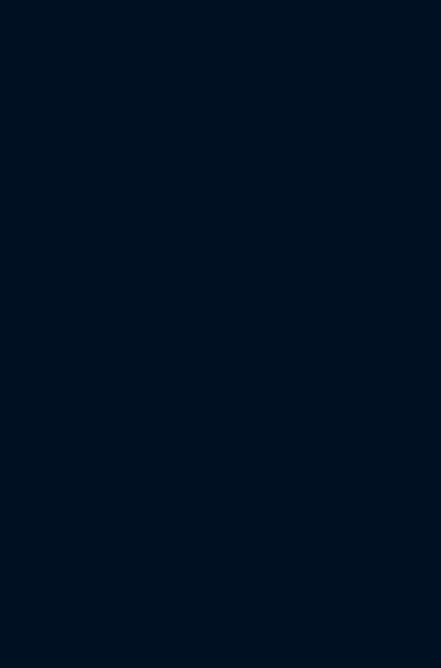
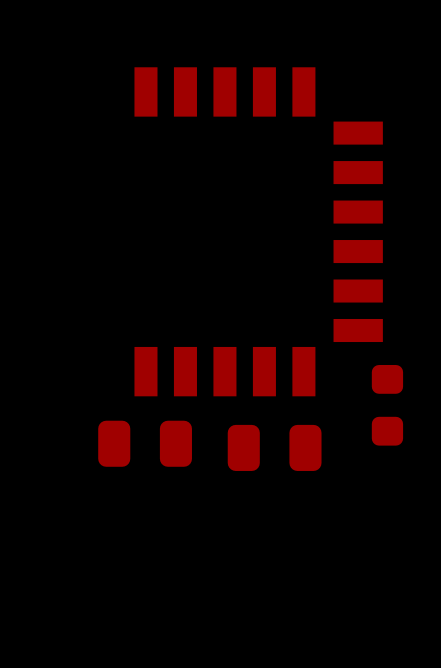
part: none -> (258, 231)
part: none -> (387, 405)
part: none -> (145, 443)
part: none -> (274, 447)

